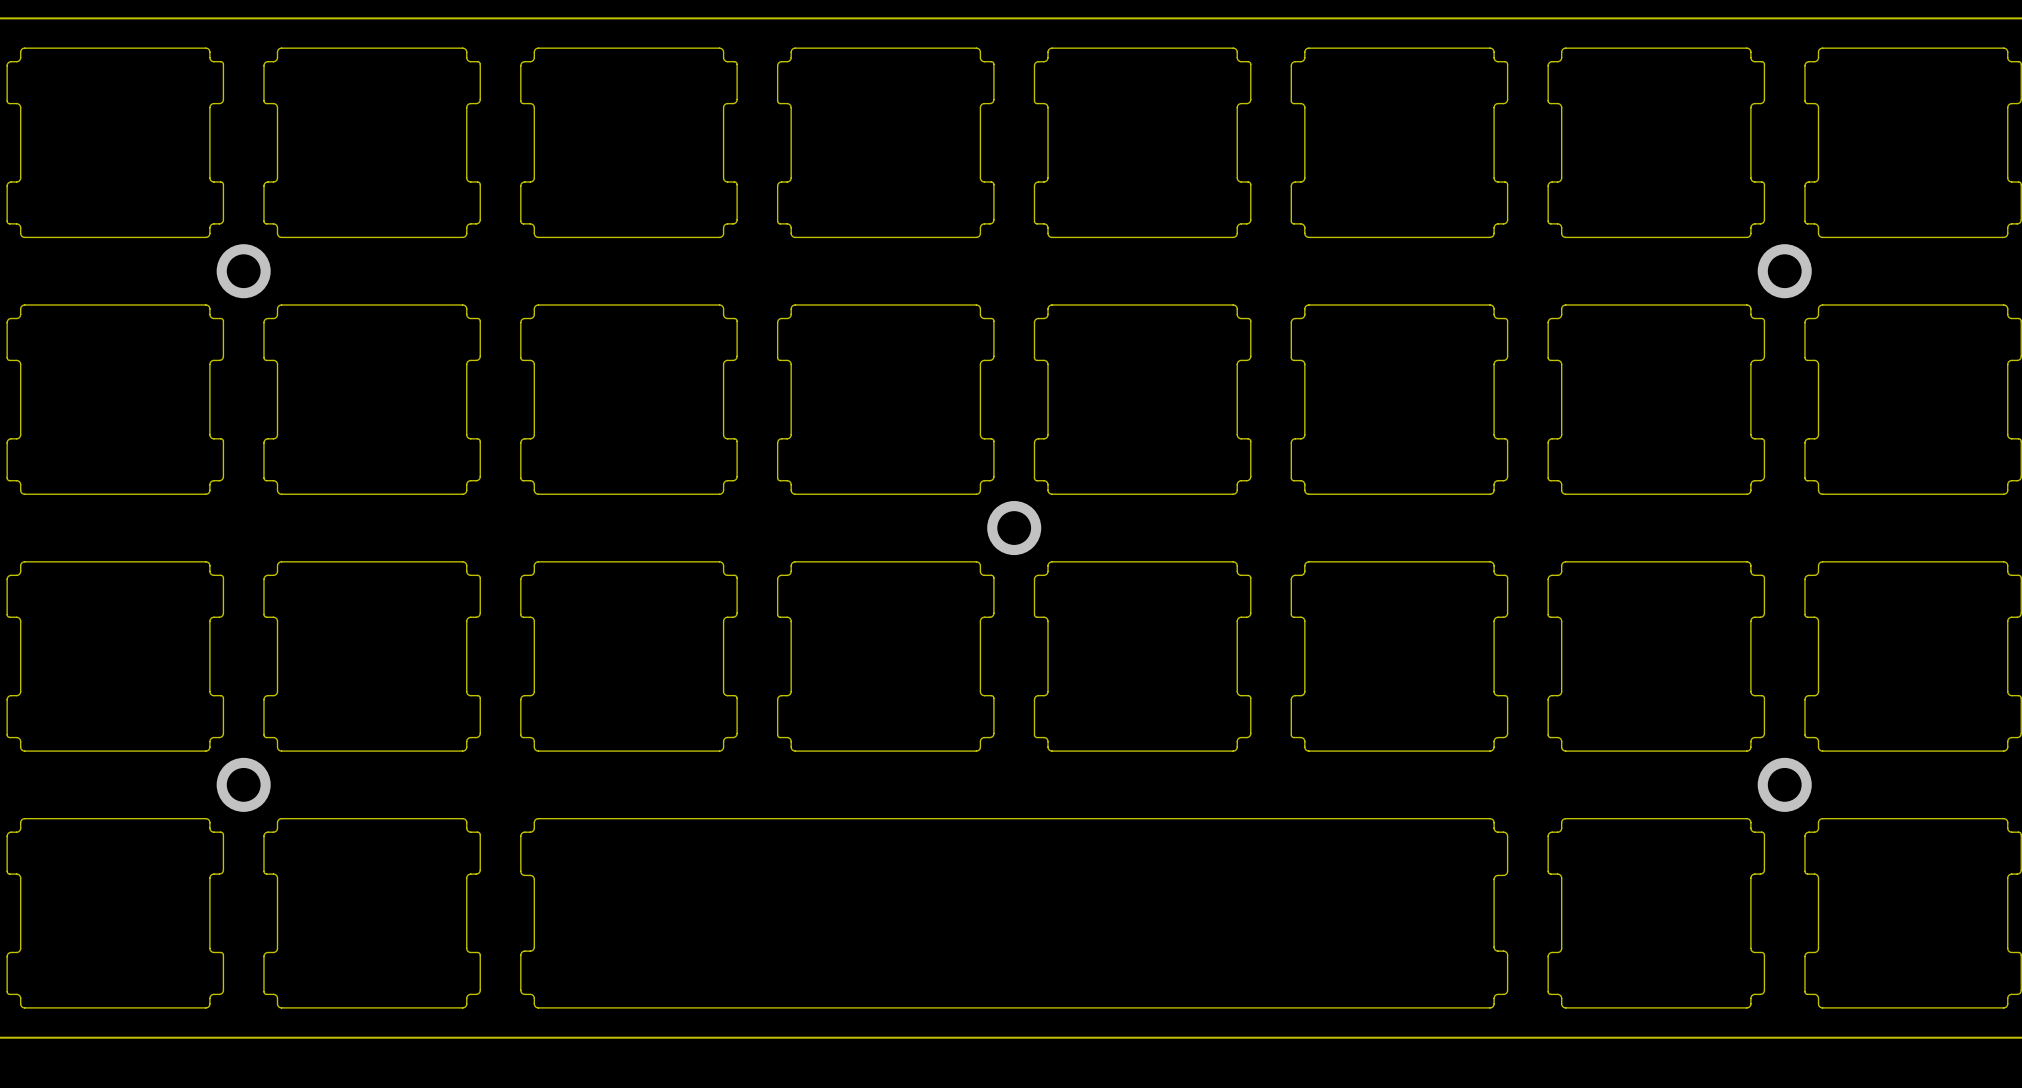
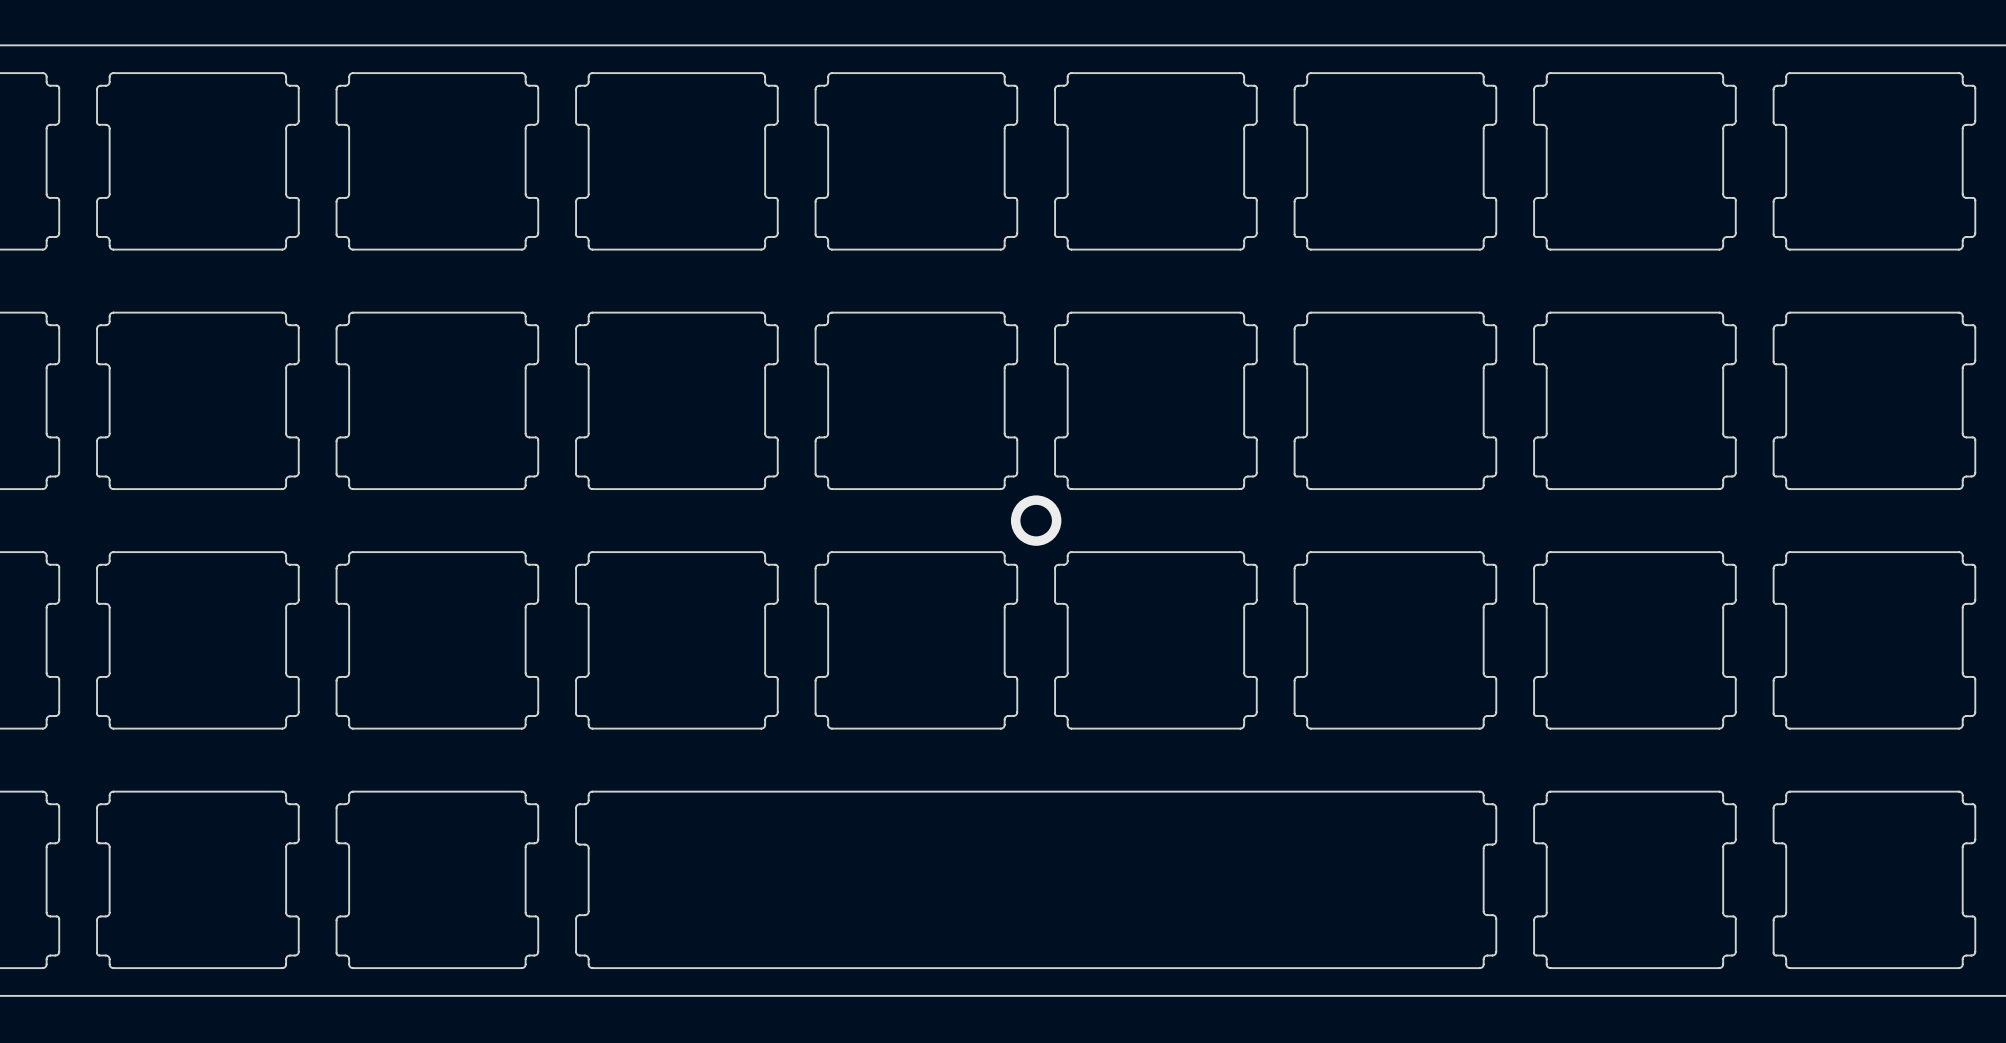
via: (243, 271) -> none
via: (1784, 271) -> none
via: (243, 784) -> none
via: (1784, 784) -> none

